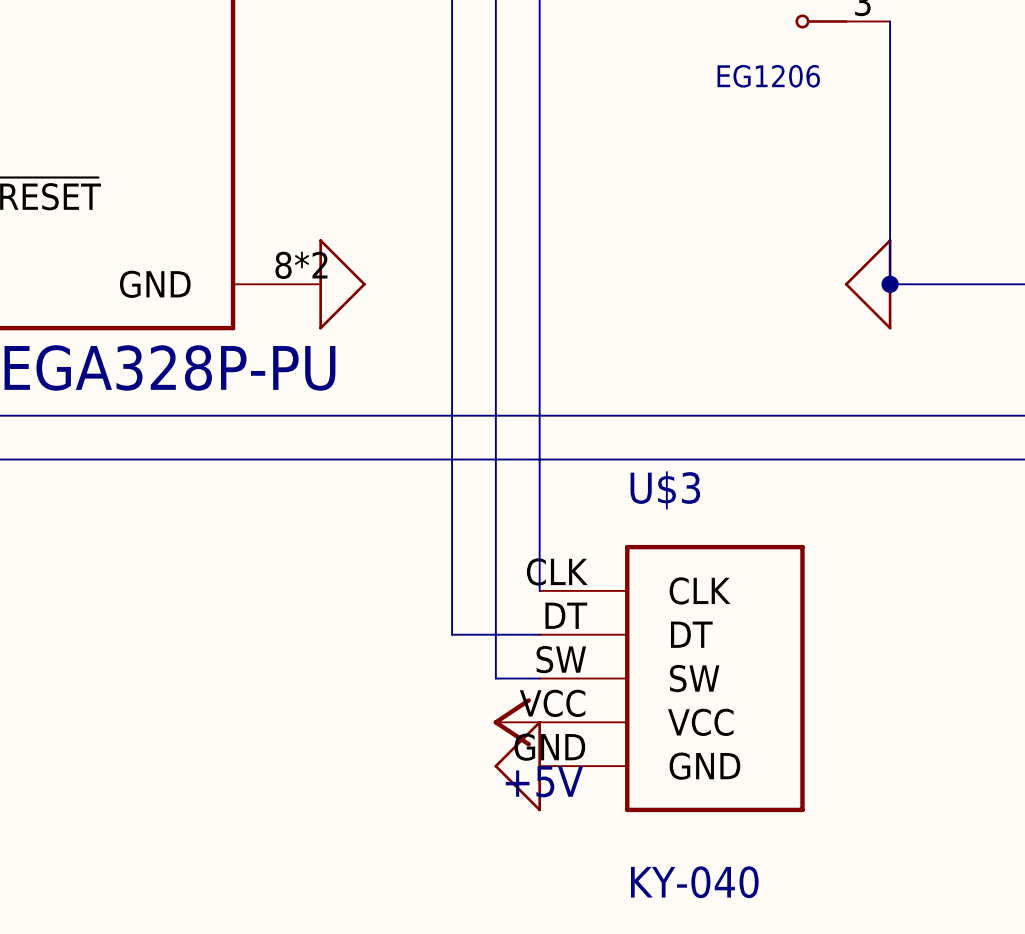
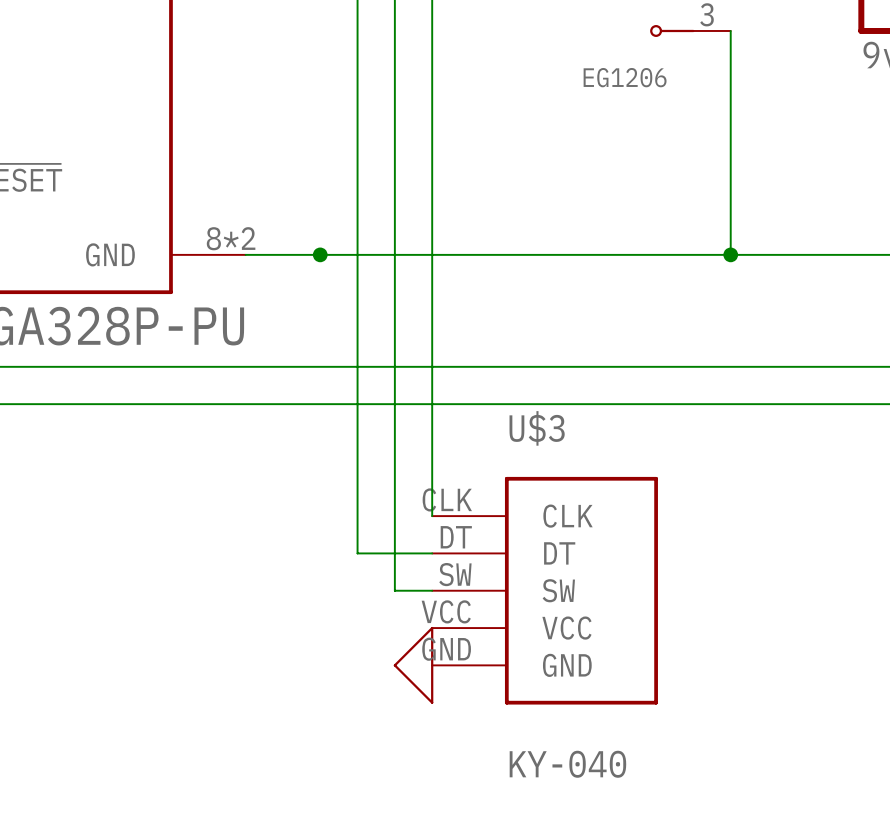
wire: none -> (245, 254) (730, 254)
power symbol: (342, 284) -> none
junction: none -> (320, 254)
power symbol: (868, 284) -> none
power symbol: +5V (516, 722) -> none

